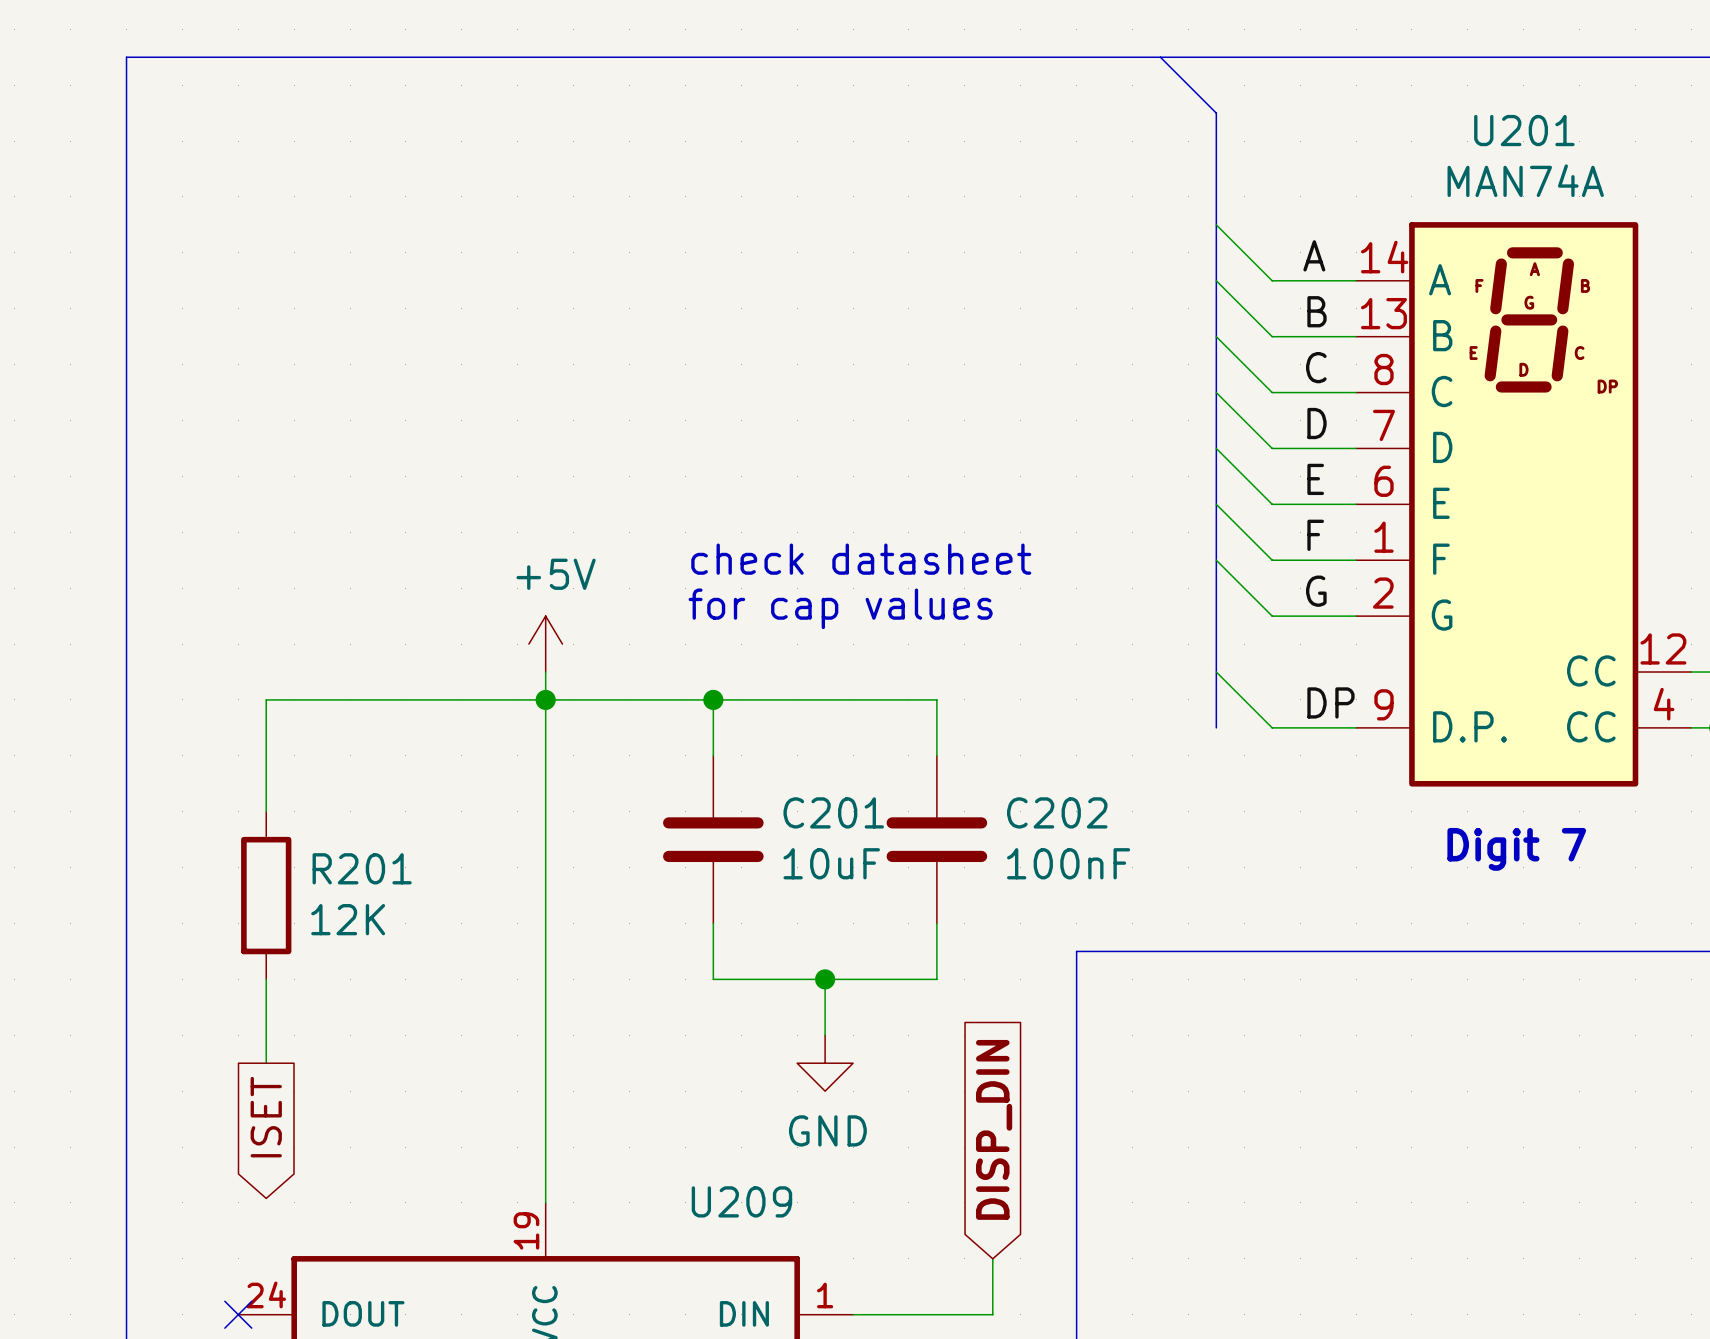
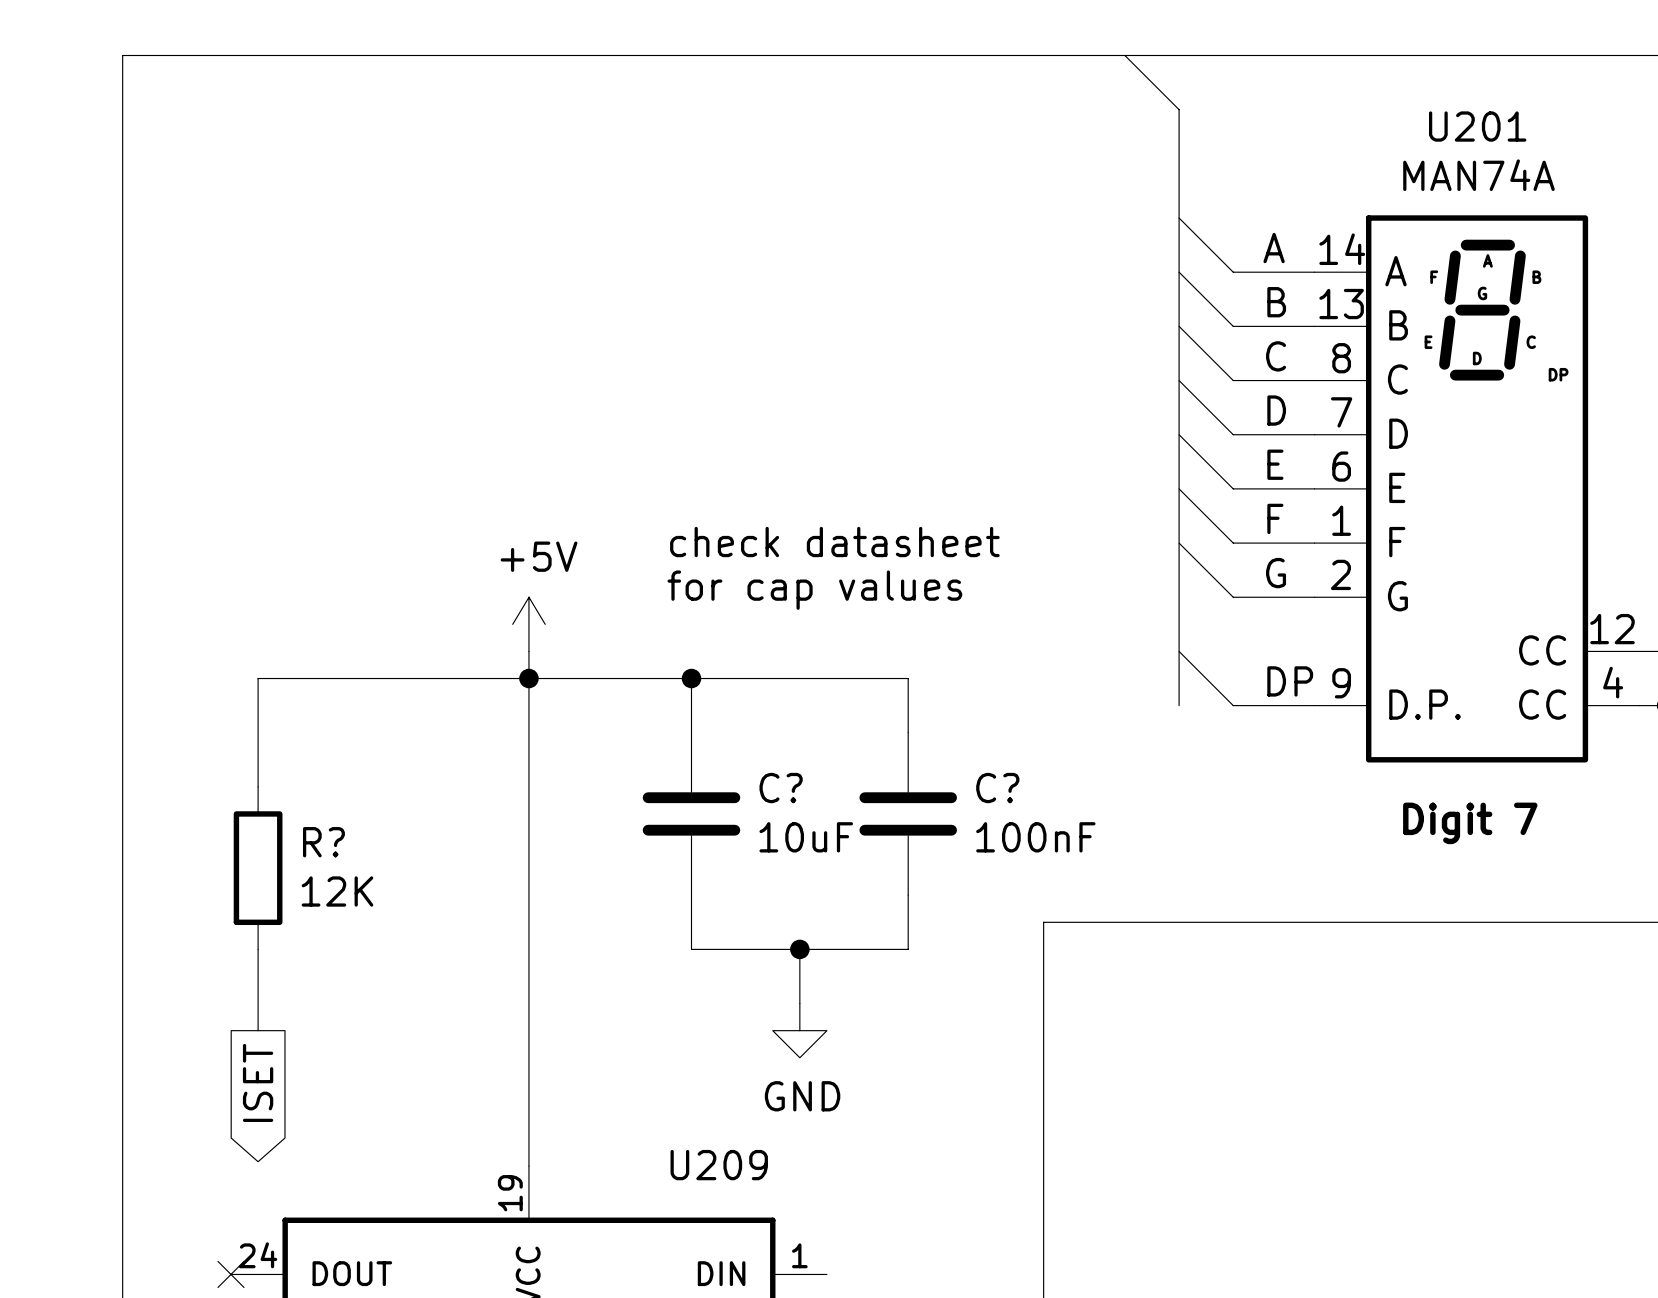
C201 name: C201 (833, 812) -> C? (781, 788)
C202 name: C202 (1057, 812) -> C? (997, 788)
R201 name: R201 (362, 868) -> R? (323, 842)
global label: DISP_DIN (994, 1129) -> none
wire: (992, 1258) (992, 1314) (853, 1314) -> none

